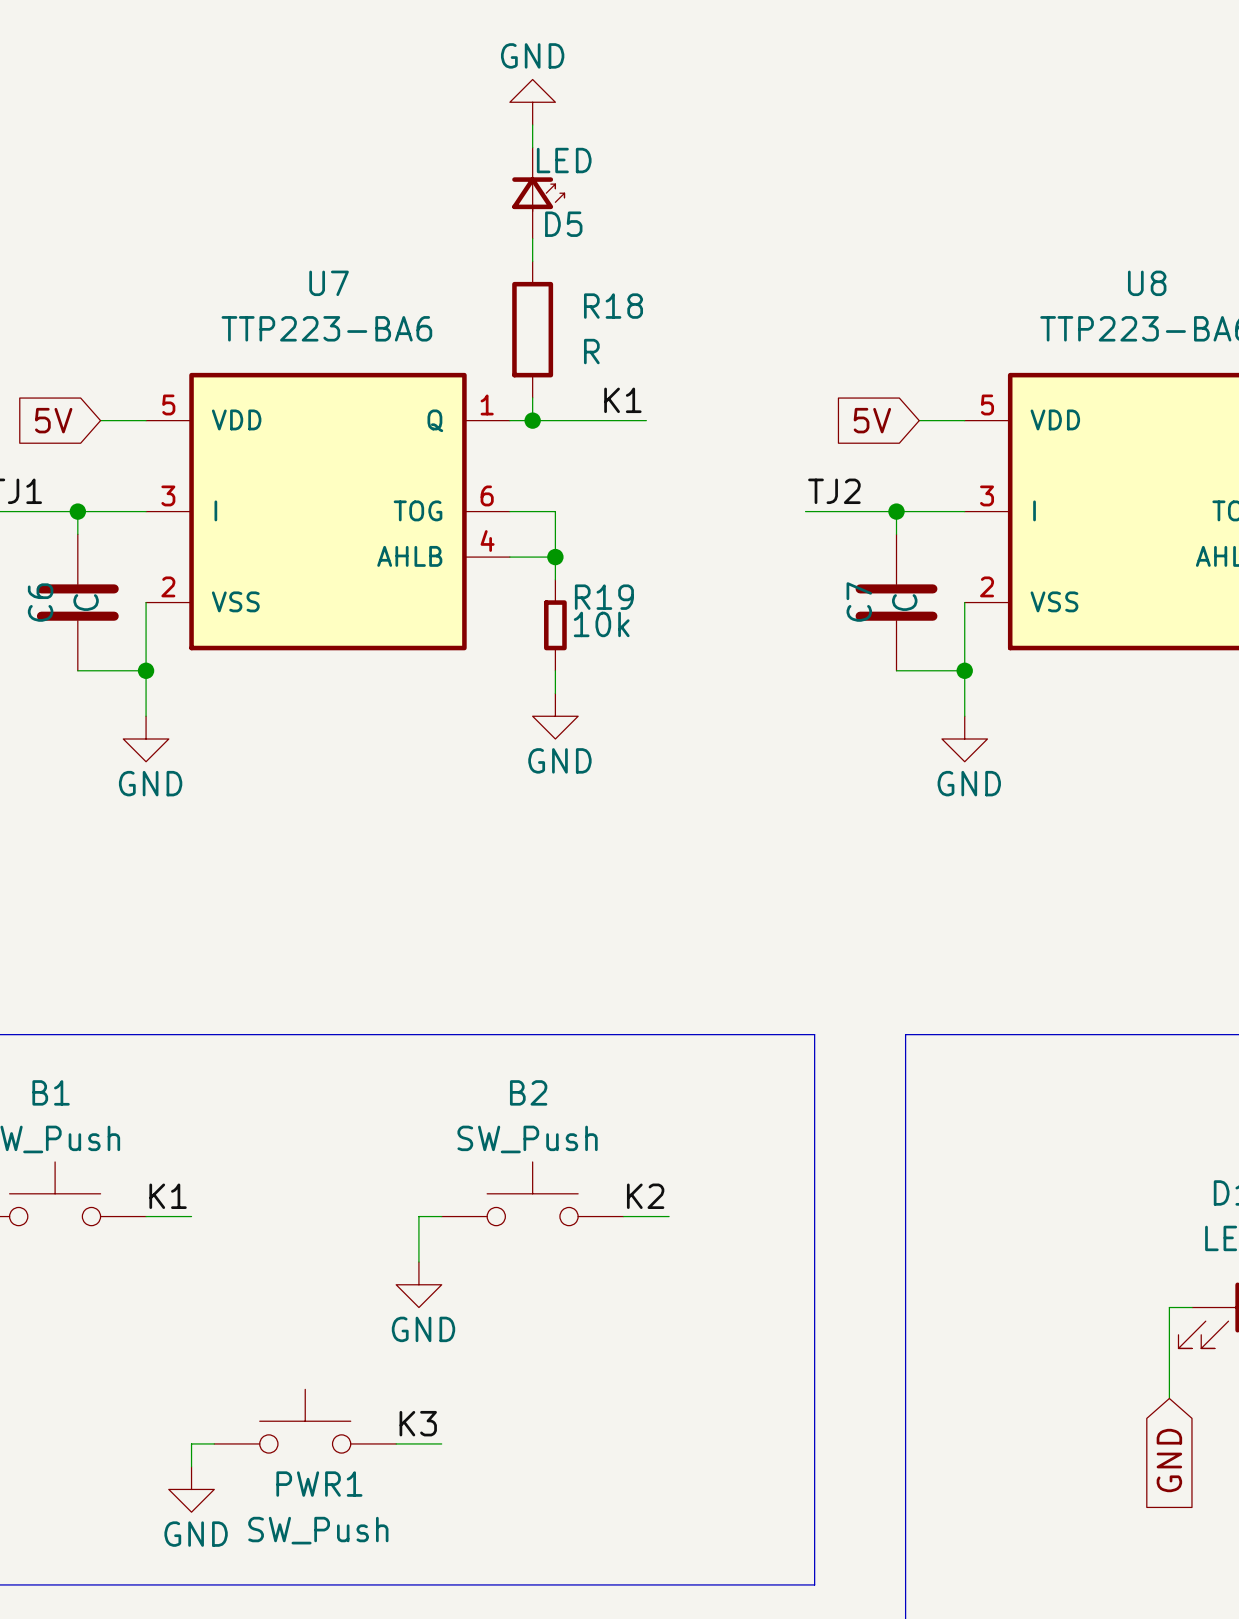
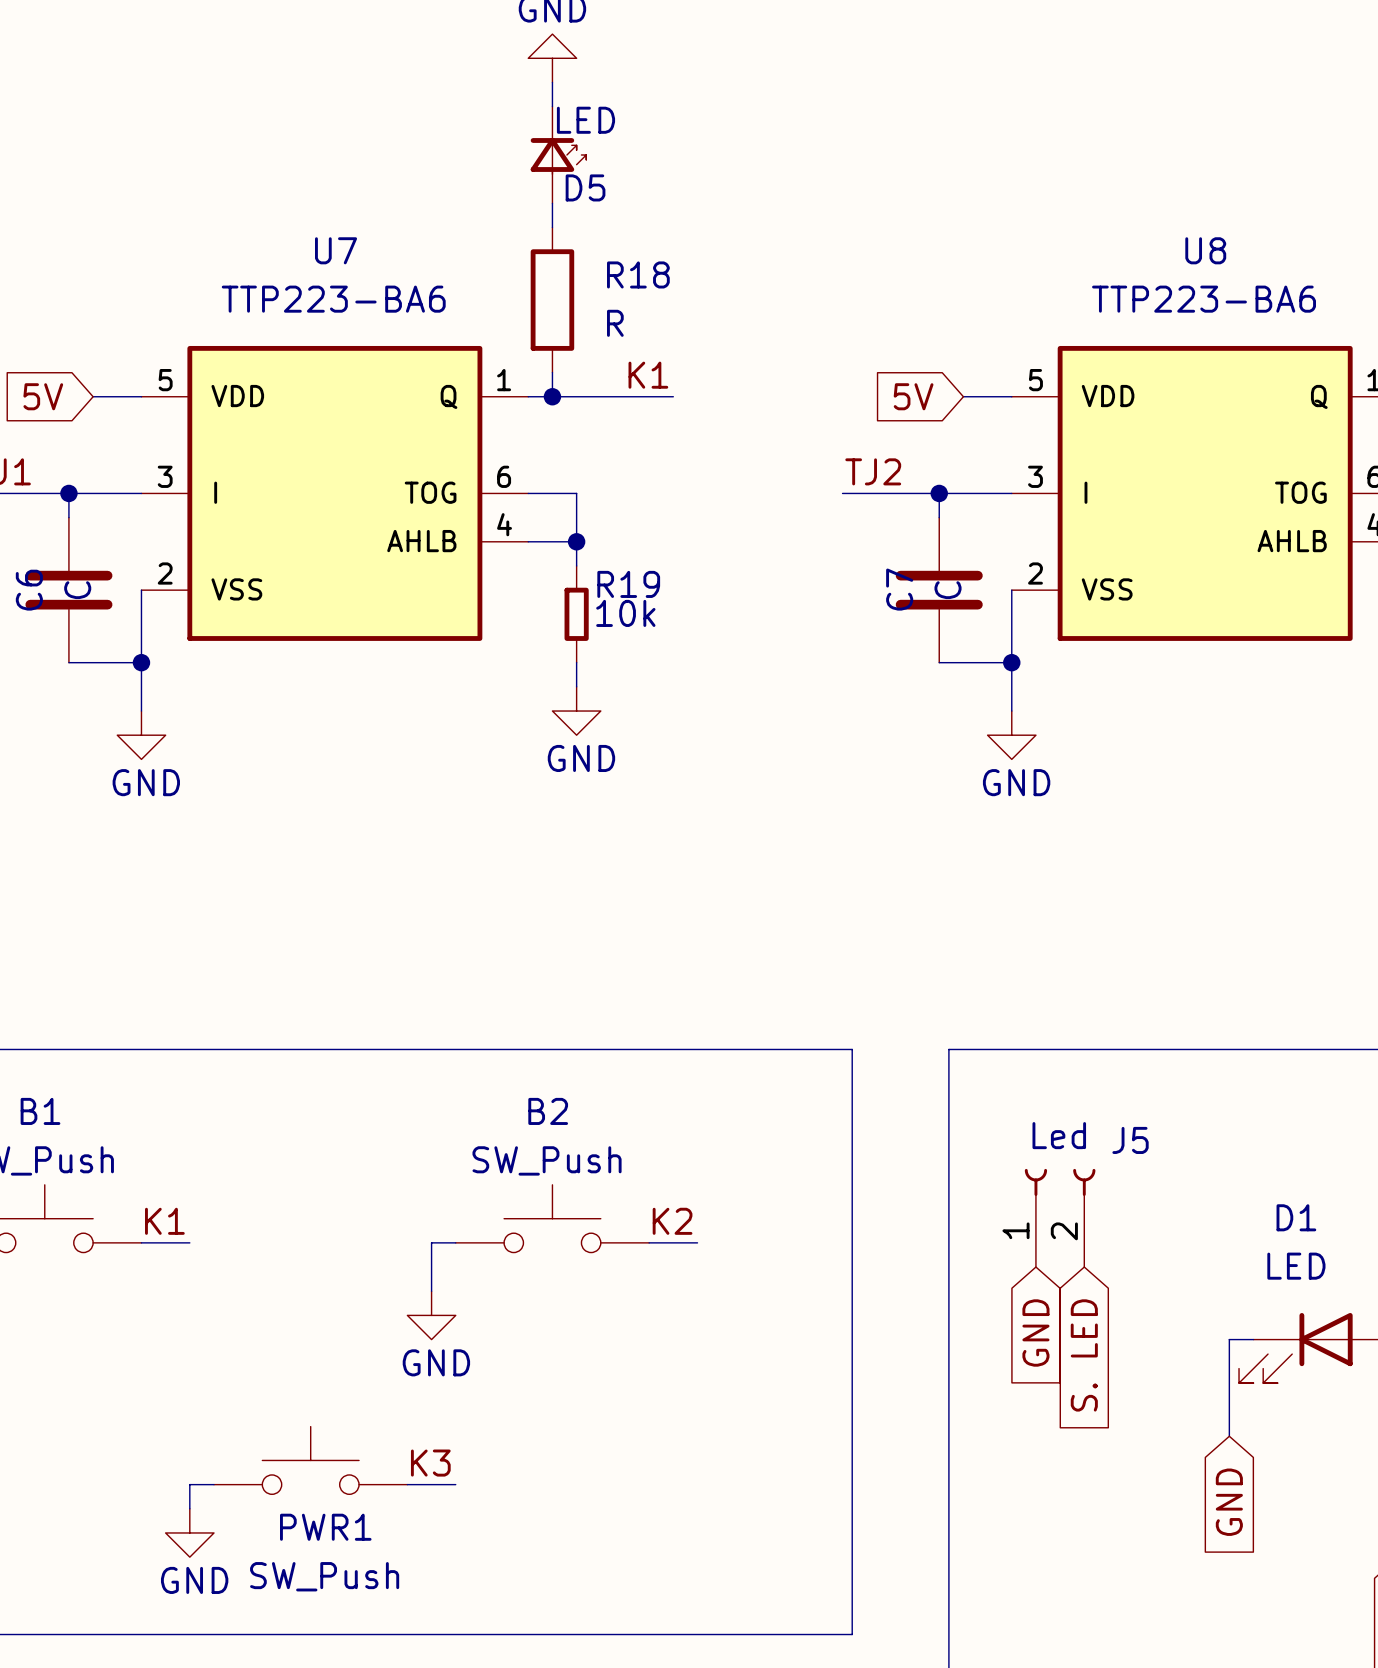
J5: none -> Led (1060, 1217)
global label: none -> GND (1035, 1333)
global label: none -> S. LED (1084, 1355)

